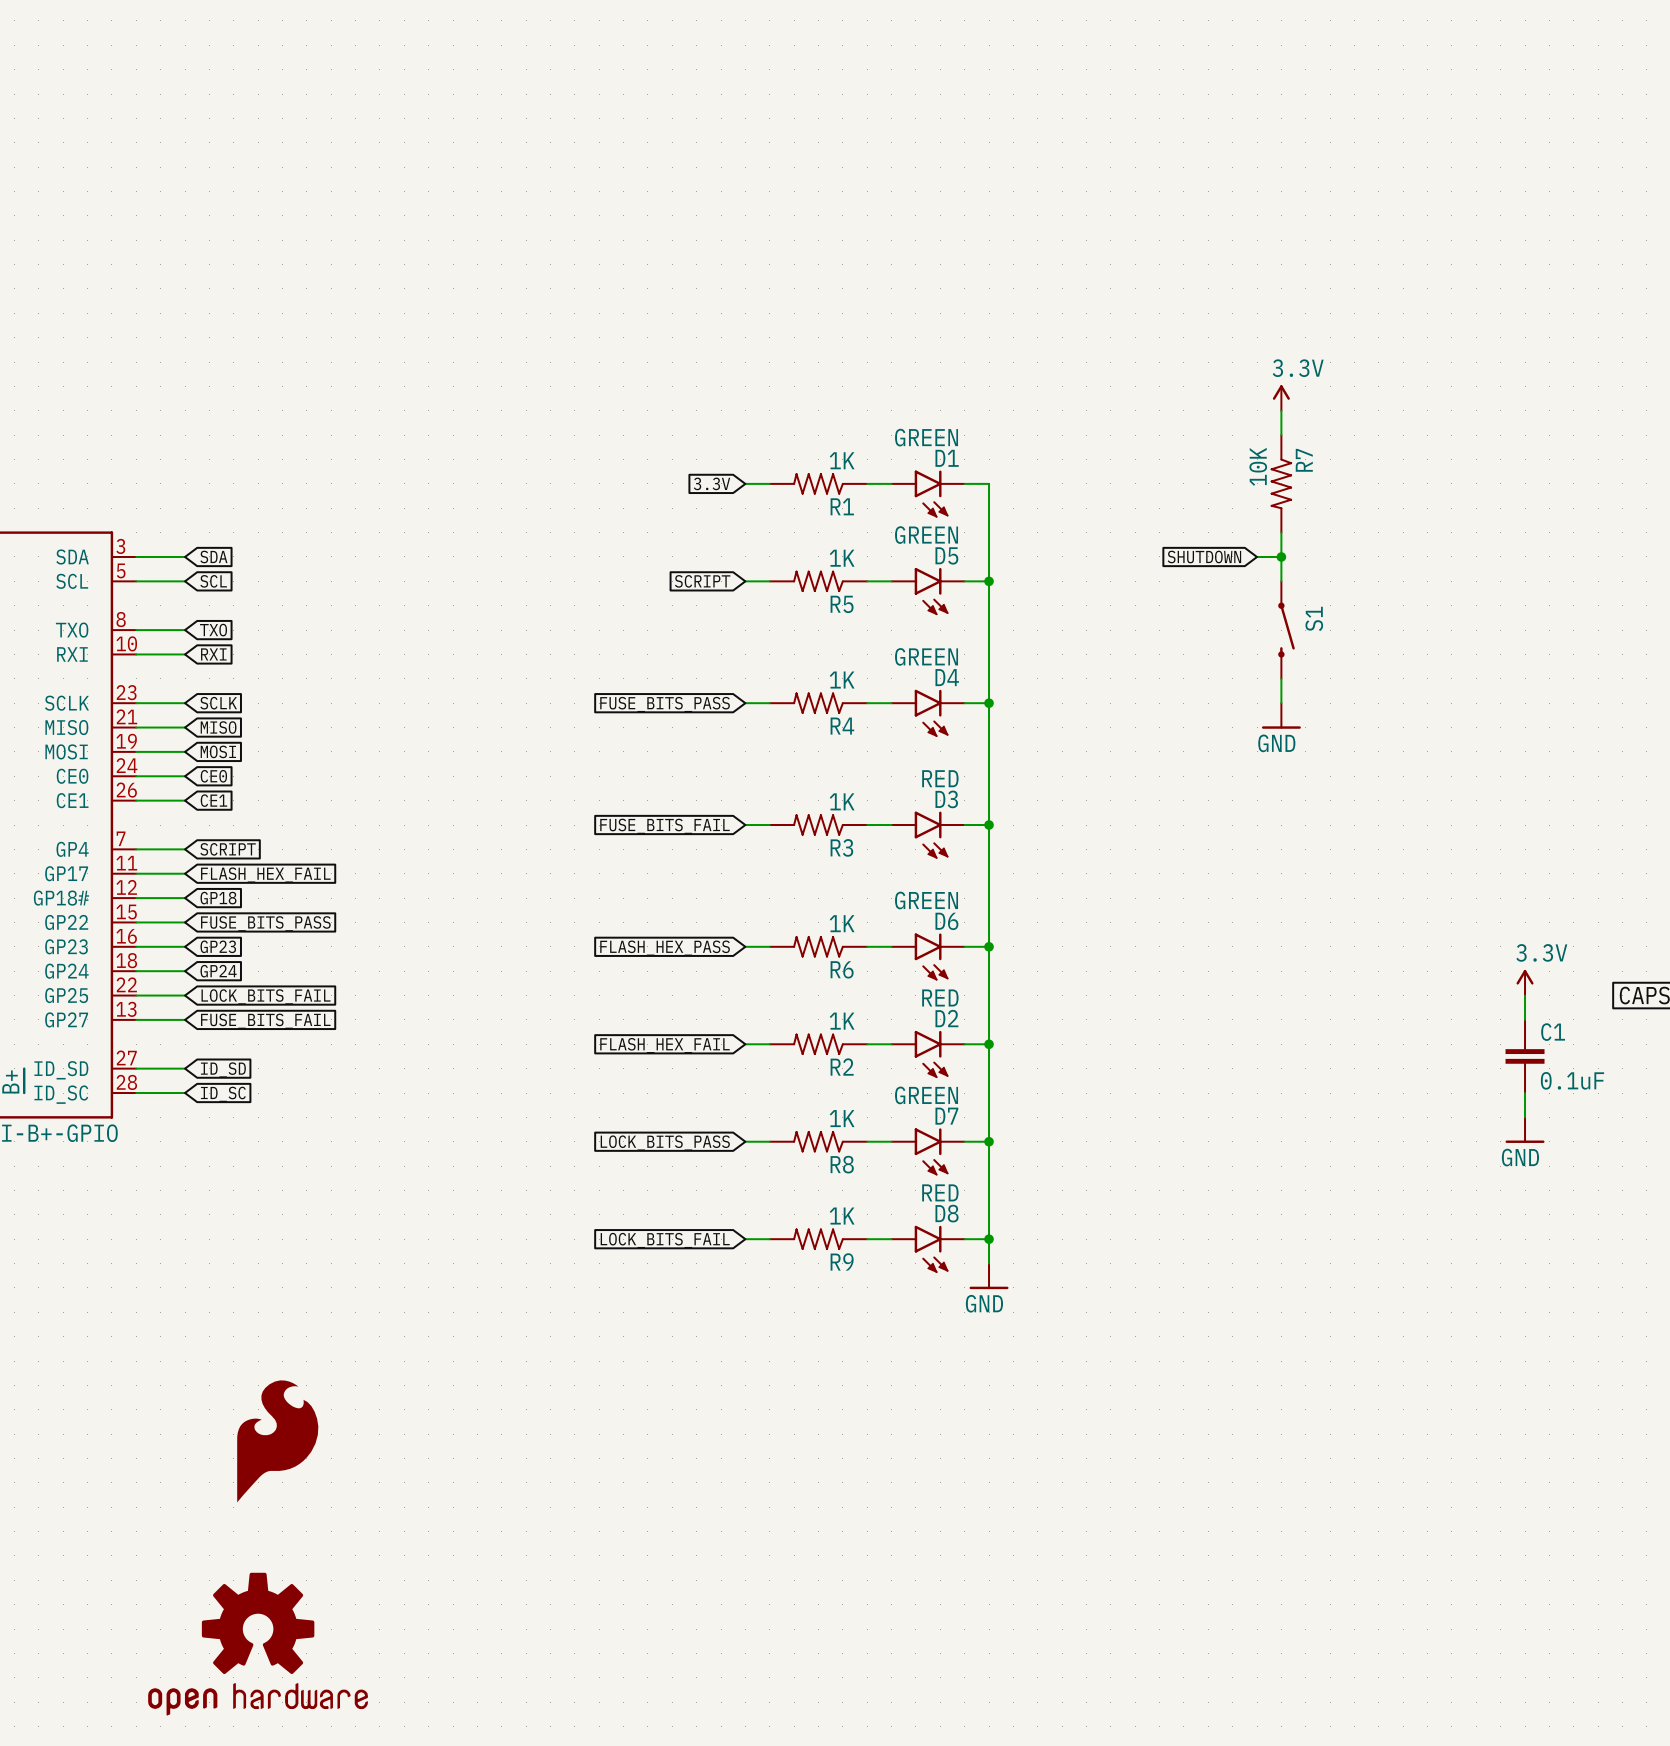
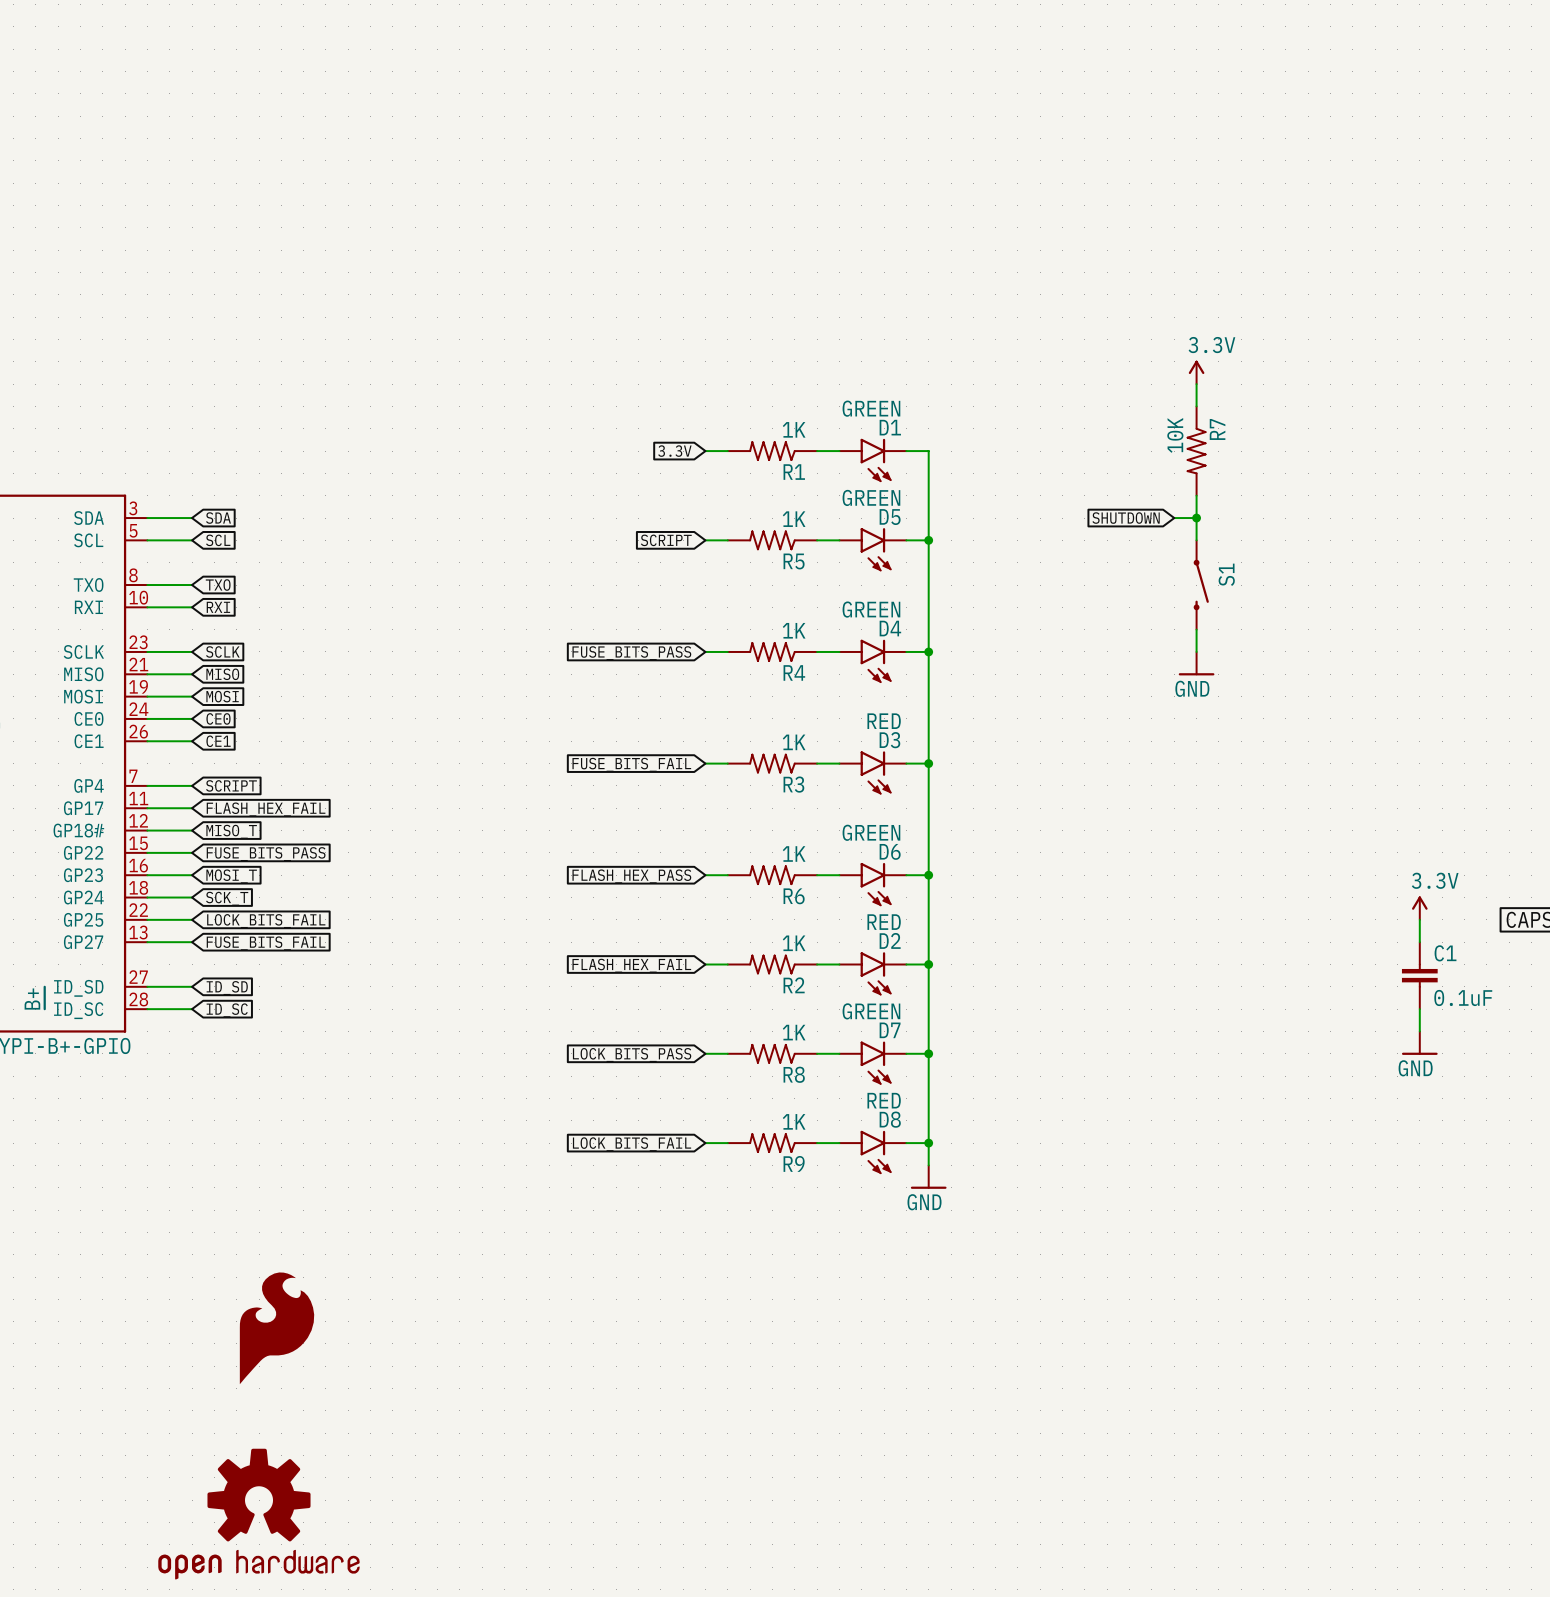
global label: GP18 (218, 898) -> MISO_T (231, 831)
global label: GP23 (218, 946) -> MOSI_T (231, 876)
global label: GP24 (218, 971) -> SCK_T (227, 898)

